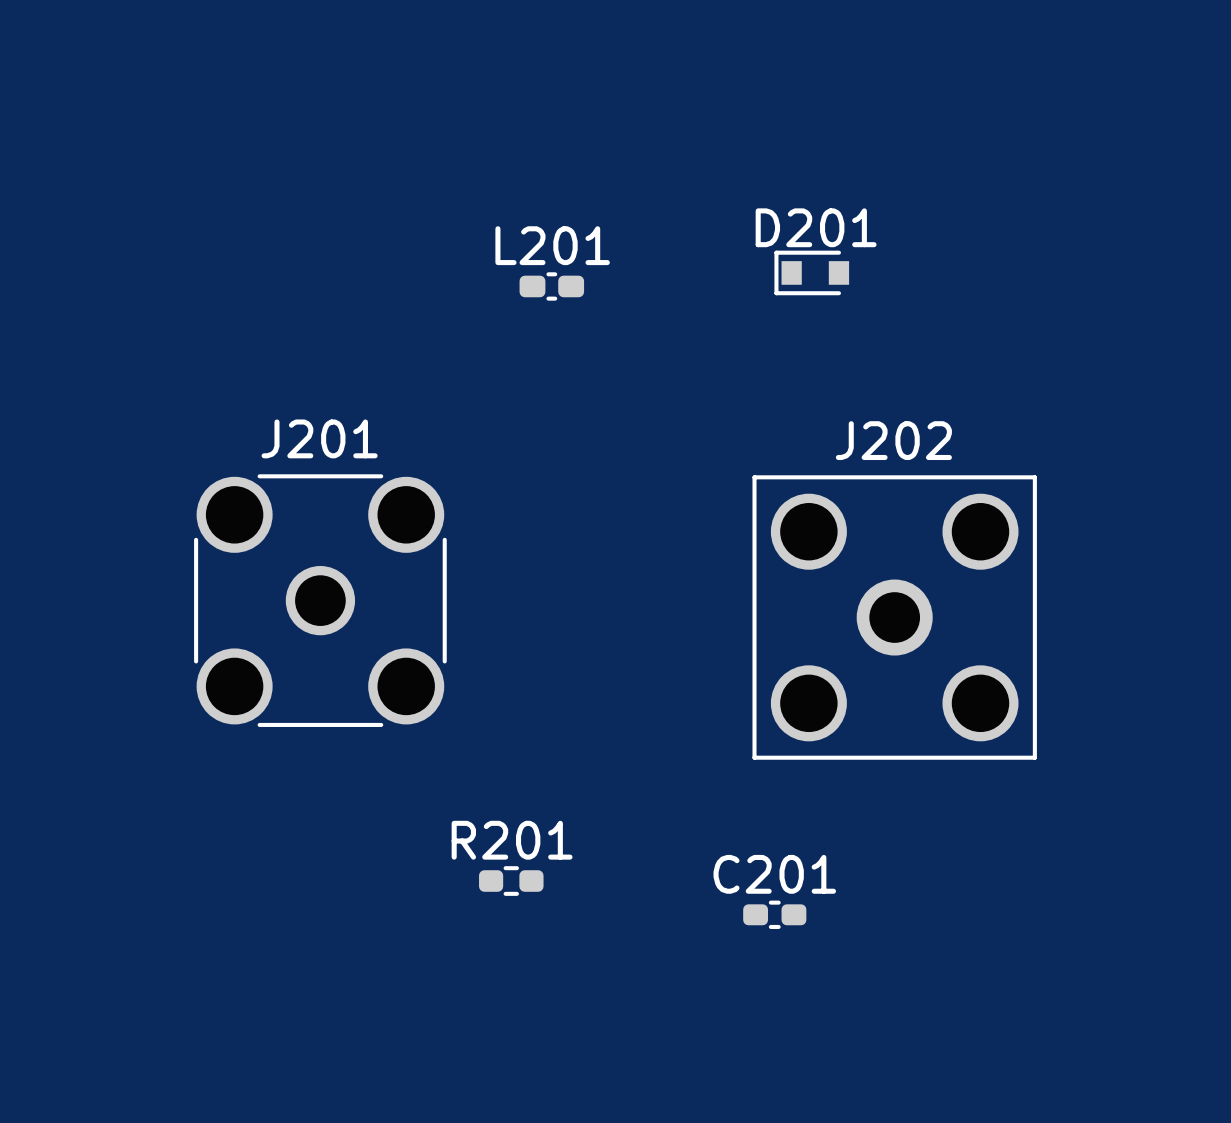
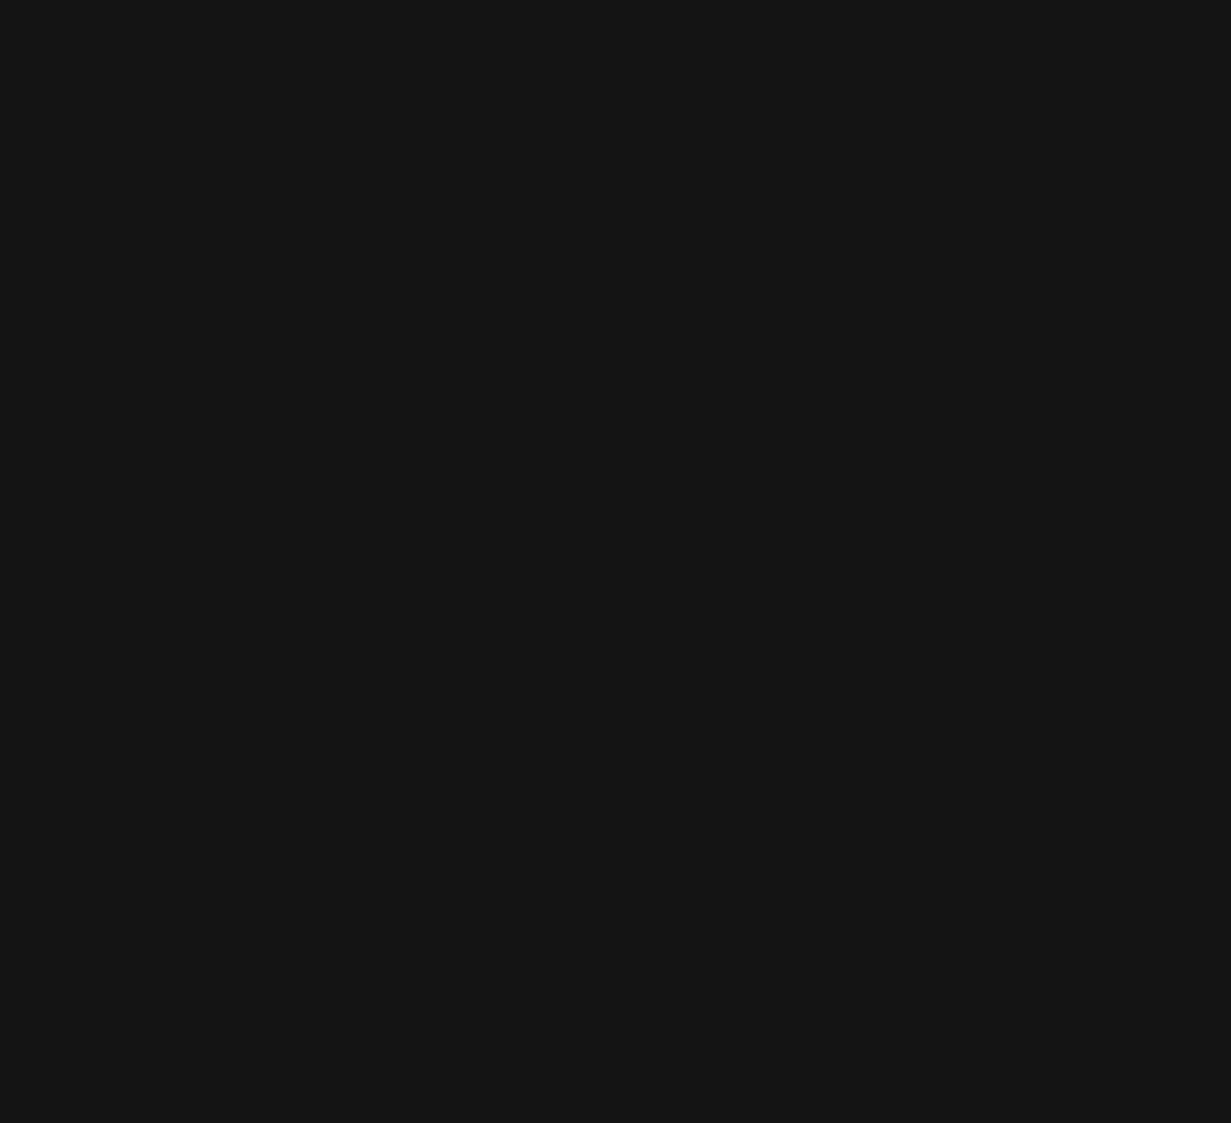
D201: (811, 272) -> none
L201: (551, 286) -> none
J201: (320, 600) -> none
J202: (894, 617) -> none
R201: (511, 881) -> none
C201: (774, 914) -> none

